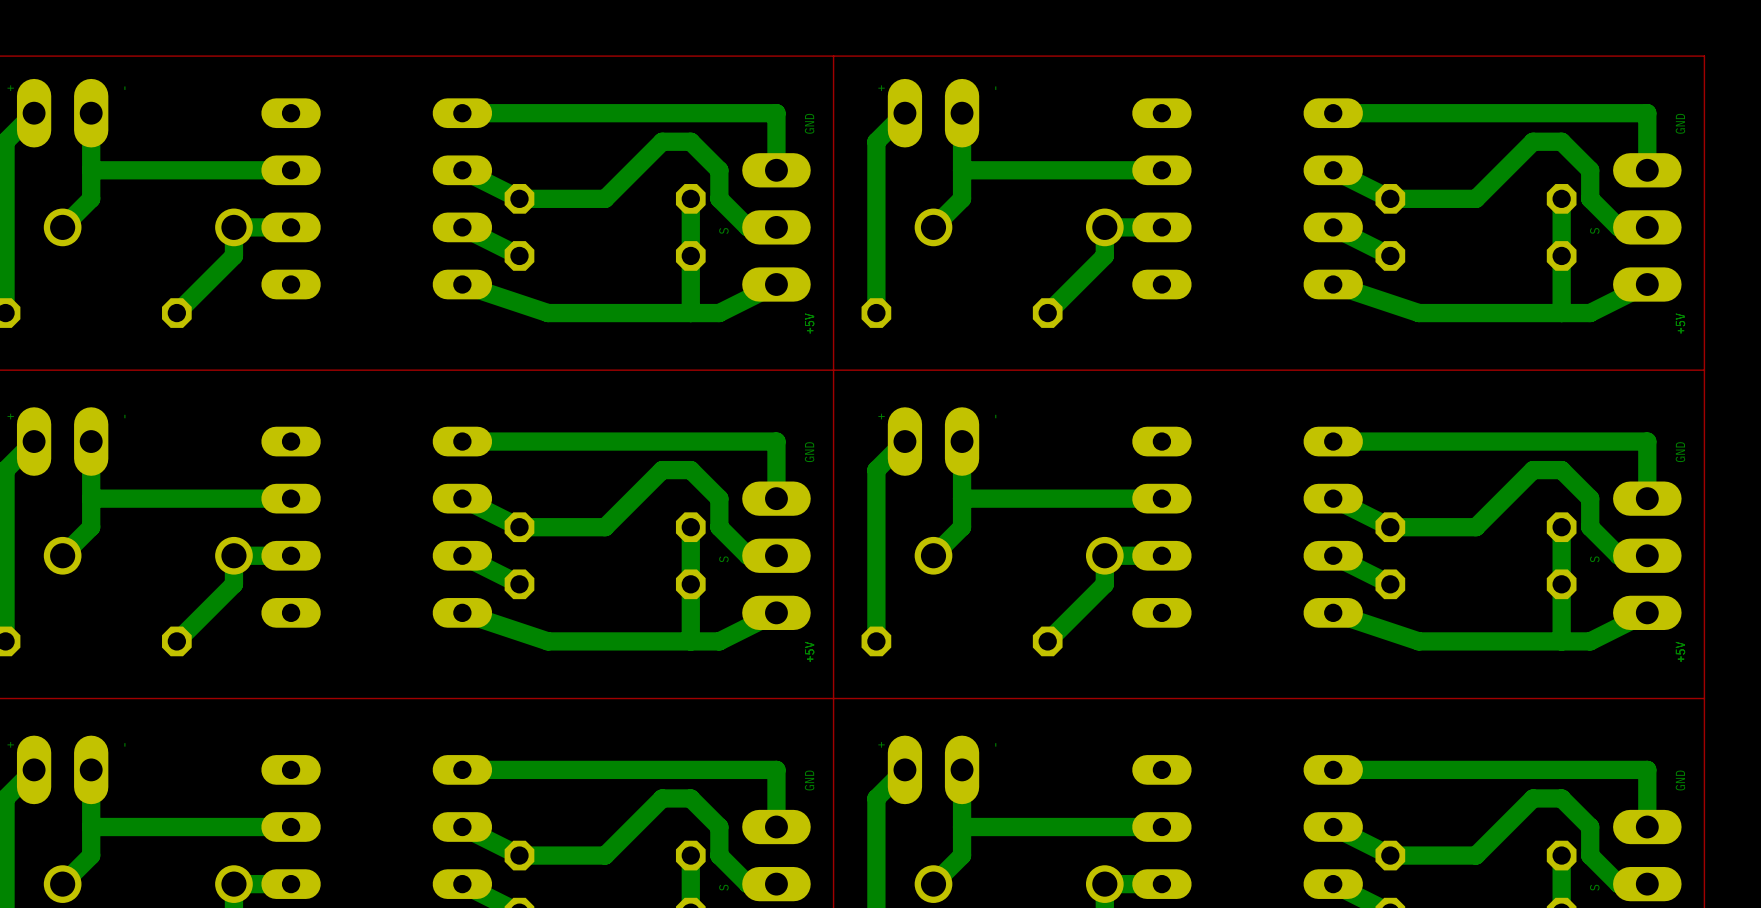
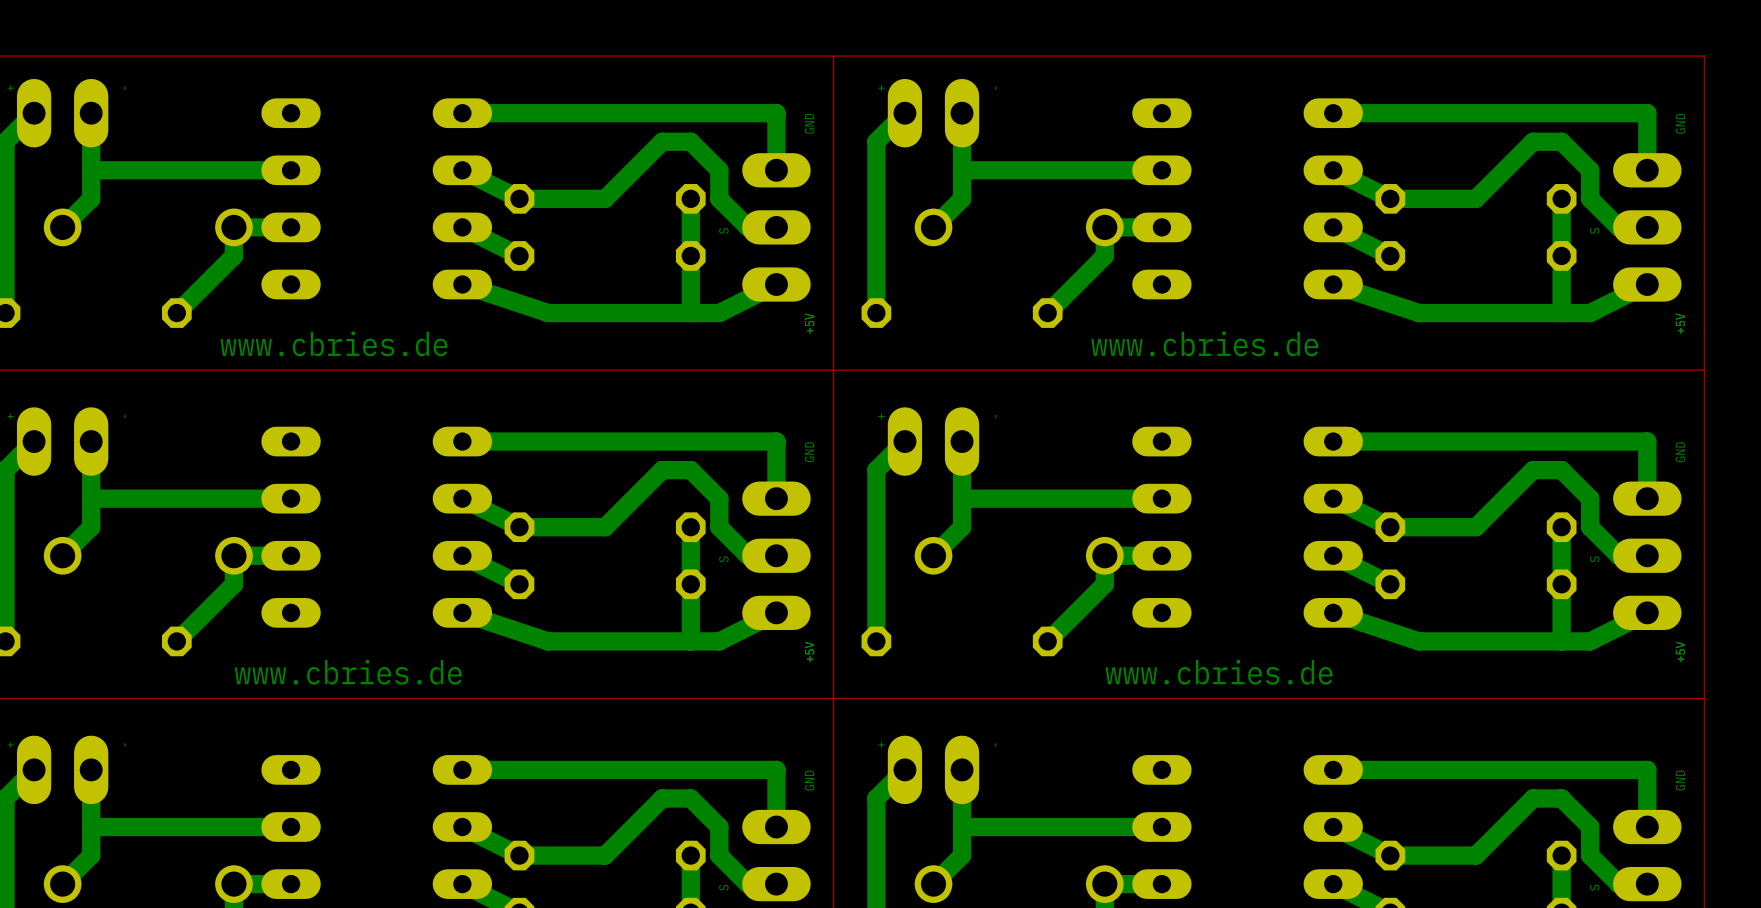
text: none -> www.cbries.de (334, 343)
text: none -> www.cbries.de (1204, 343)
text: none -> www.cbries.de (348, 672)
text: none -> www.cbries.de (1219, 672)

